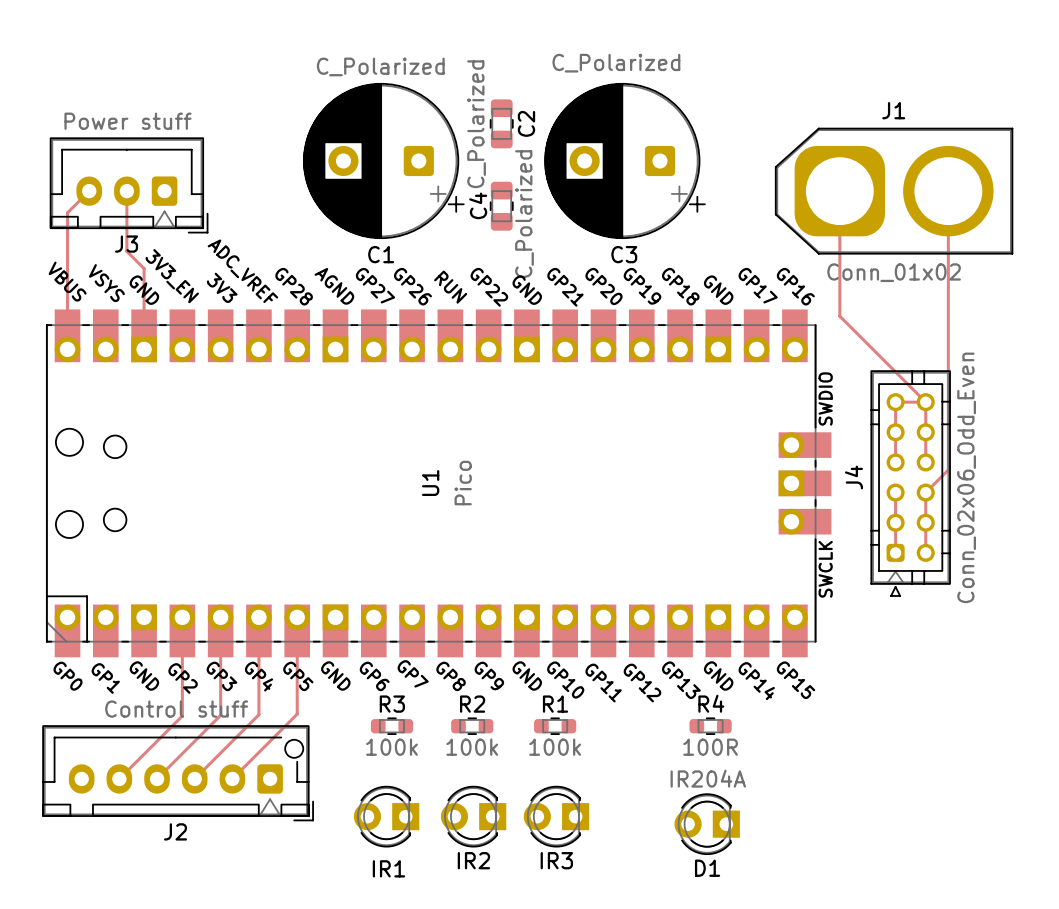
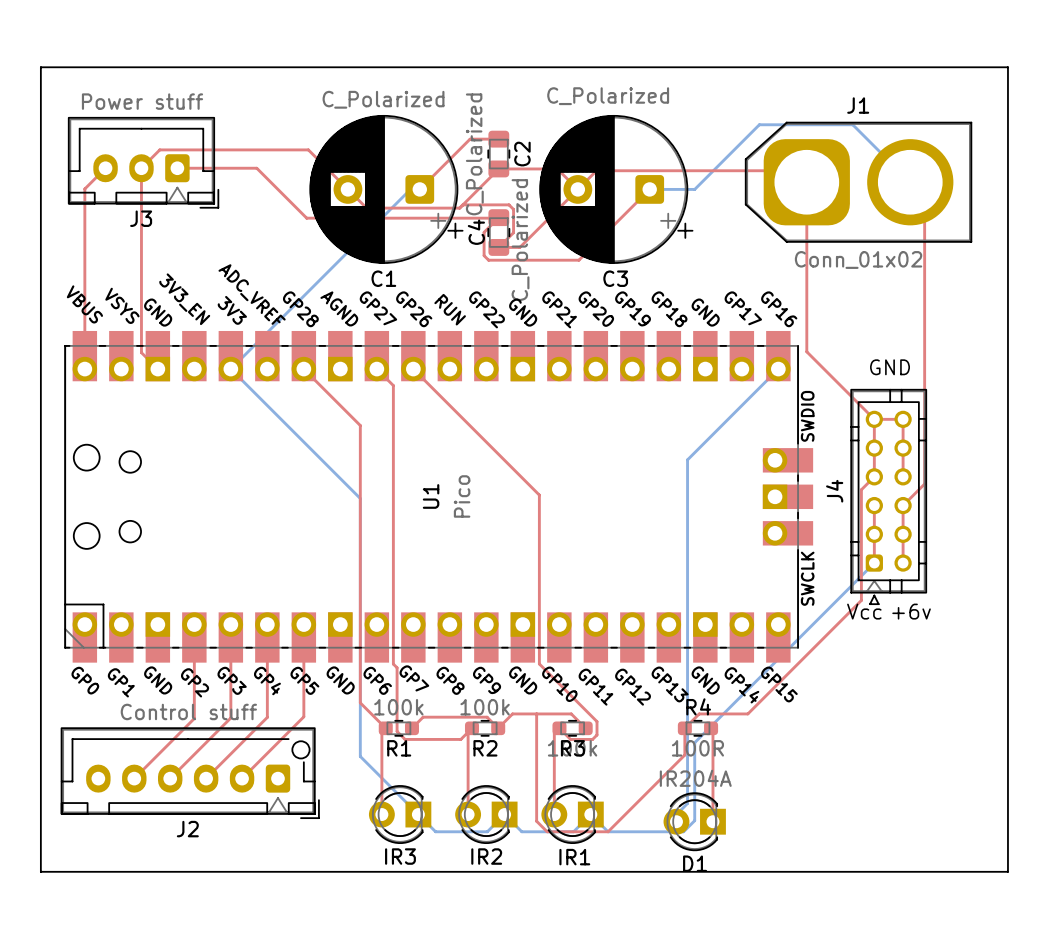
board edge: none -> (40, 67) (1007, 67) (1007, 871) (40, 871) (40, 67)
top track: none -> (498, 139) (470, 139) (419, 189)
top track: none -> (177, 168) (256, 168) (306, 218) (498, 217) (484, 232) (484, 255) (488, 260) (578, 260) (649, 189)
bottom track: none -> (910, 182) (852, 124) (759, 124) (694, 189) (649, 189)
bottom track: none -> (419, 189) (410, 189) (230, 369) (360, 498) (360, 756) (435, 831) (487, 831) (504, 814) (521, 831) (573, 831) (590, 814) (608, 831) (683, 831) (694, 820) (694, 742) (874, 563)
top track: none -> (577, 189) (557, 168) (498, 168) (459, 208) (366, 208) (308, 149) (159, 149) (141, 168) (141, 218)
top track: none -> (462, 204) (509, 204) (513, 209) (513, 232) (498, 247) (519, 247) (596, 170) (795, 170) (806, 182) (806, 351) (874, 419)
J3 position: (129, 185) -> (143, 162)
top track: (89, 191) (67, 212) -> (105, 168) (84, 188) (84, 238)
top track: (839, 191) (839, 316) (925, 402) -> none
J1 position: (894, 191) -> (858, 182)
top track: (126, 251) (144, 268) (144, 349) -> (141, 275) (141, 352) (157, 369)
text: none -> GND (890, 367)
top track: none -> (303, 369) (360, 425) (360, 702) (385, 728) (381, 732) (381, 814)
top track: none -> (376, 369) (393, 385) (393, 664) (397, 667) (397, 731) (405, 739) (460, 739) (471, 728)
top track: none -> (413, 369) (539, 495) (539, 663) (597, 721) (597, 735) (592, 739) (570, 739) (559, 728) (554, 733) (554, 814)
bottom track: none -> (778, 369) (687, 459) (687, 803) (676, 814)
top track: none -> (874, 476) (861, 489) (861, 600) (747, 713) (699, 713) (684, 728) (684, 755) (608, 831) (547, 831) (536, 821) (536, 713)
J4 value: Conn_02x06_Odd_Even (966, 477) -> none
text: none -> Vcc (864, 611)
text: none -> +6v (911, 611)
R3 name position: R3 (392, 704) -> R3 (572, 748)
R2 name position: R2 (472, 704) -> R2 (485, 748)
R1 name position: R1 (555, 704) -> R1 (399, 748)
R3 position: (391, 726) -> (572, 728)
top track: none -> (411, 728) (423, 717) (487, 717) (498, 728) (512, 713) (571, 713) (585, 728)
R2 position: (472, 726) -> (485, 728)
R1 position: (555, 726) -> (398, 728)
top track: none -> (711, 728) (712, 730) (712, 814)
top track: none -> (468, 732) (468, 814)
R2 value position: 100k (472, 747) -> 100k (485, 707)
R1 value position: 100k (555, 747) -> 100k (398, 707)
IR1 position: (386, 816) -> (572, 814)
IR2 position: (473, 816) -> (486, 814)
IR3 position: (556, 816) -> (400, 814)
IR1 name position: IR1 (388, 868) -> IR1 (574, 857)

